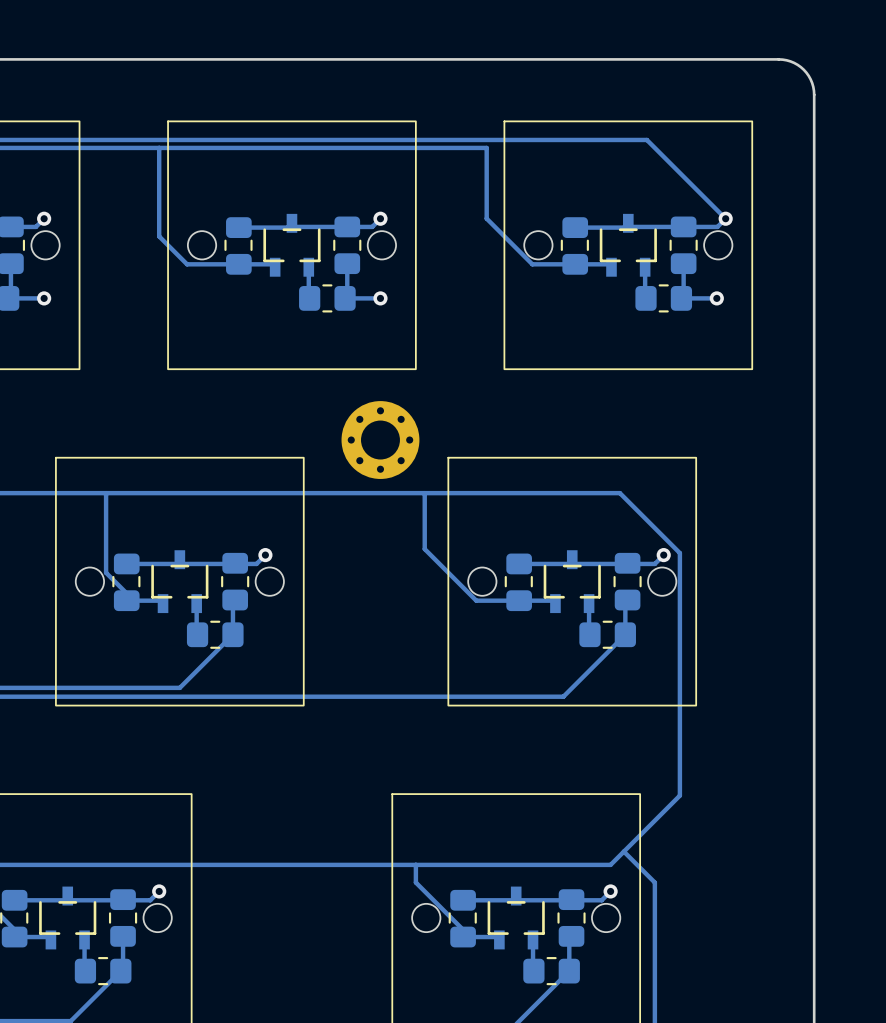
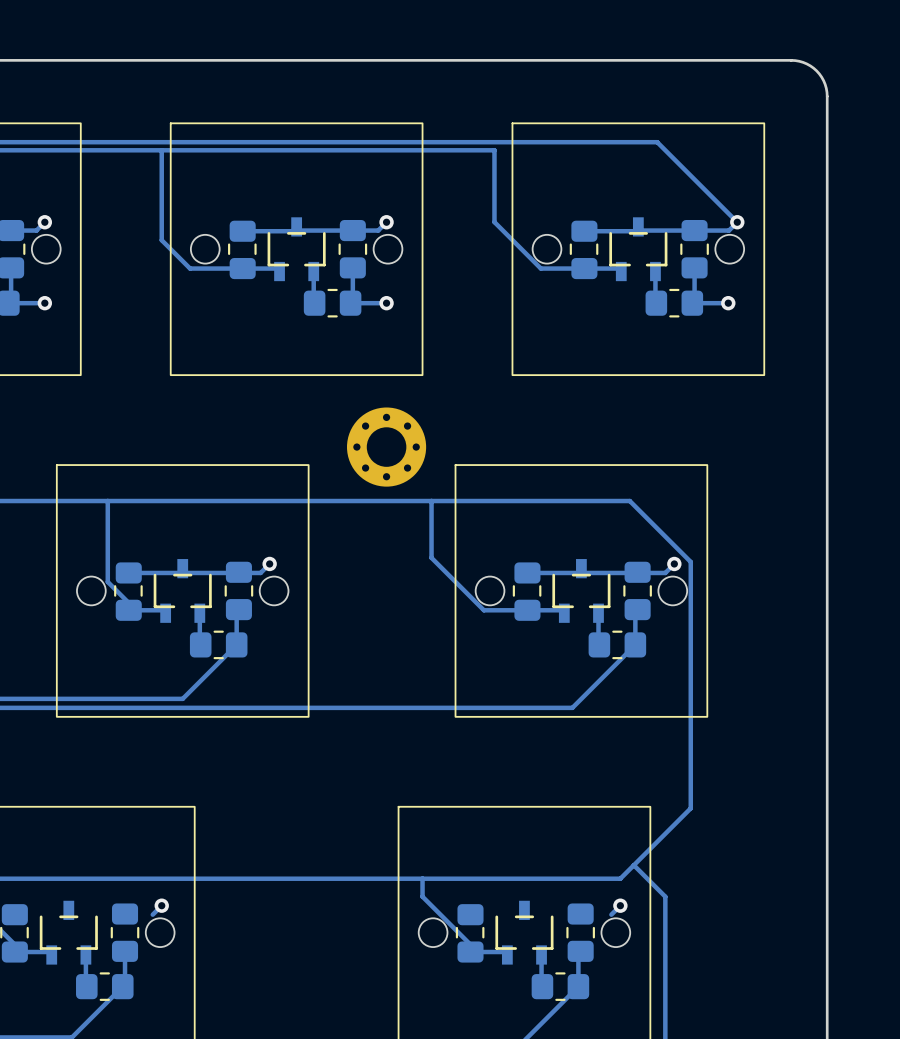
track: (150, 900) (14, 900) -> none
track: (601, 900) (463, 900) -> none

